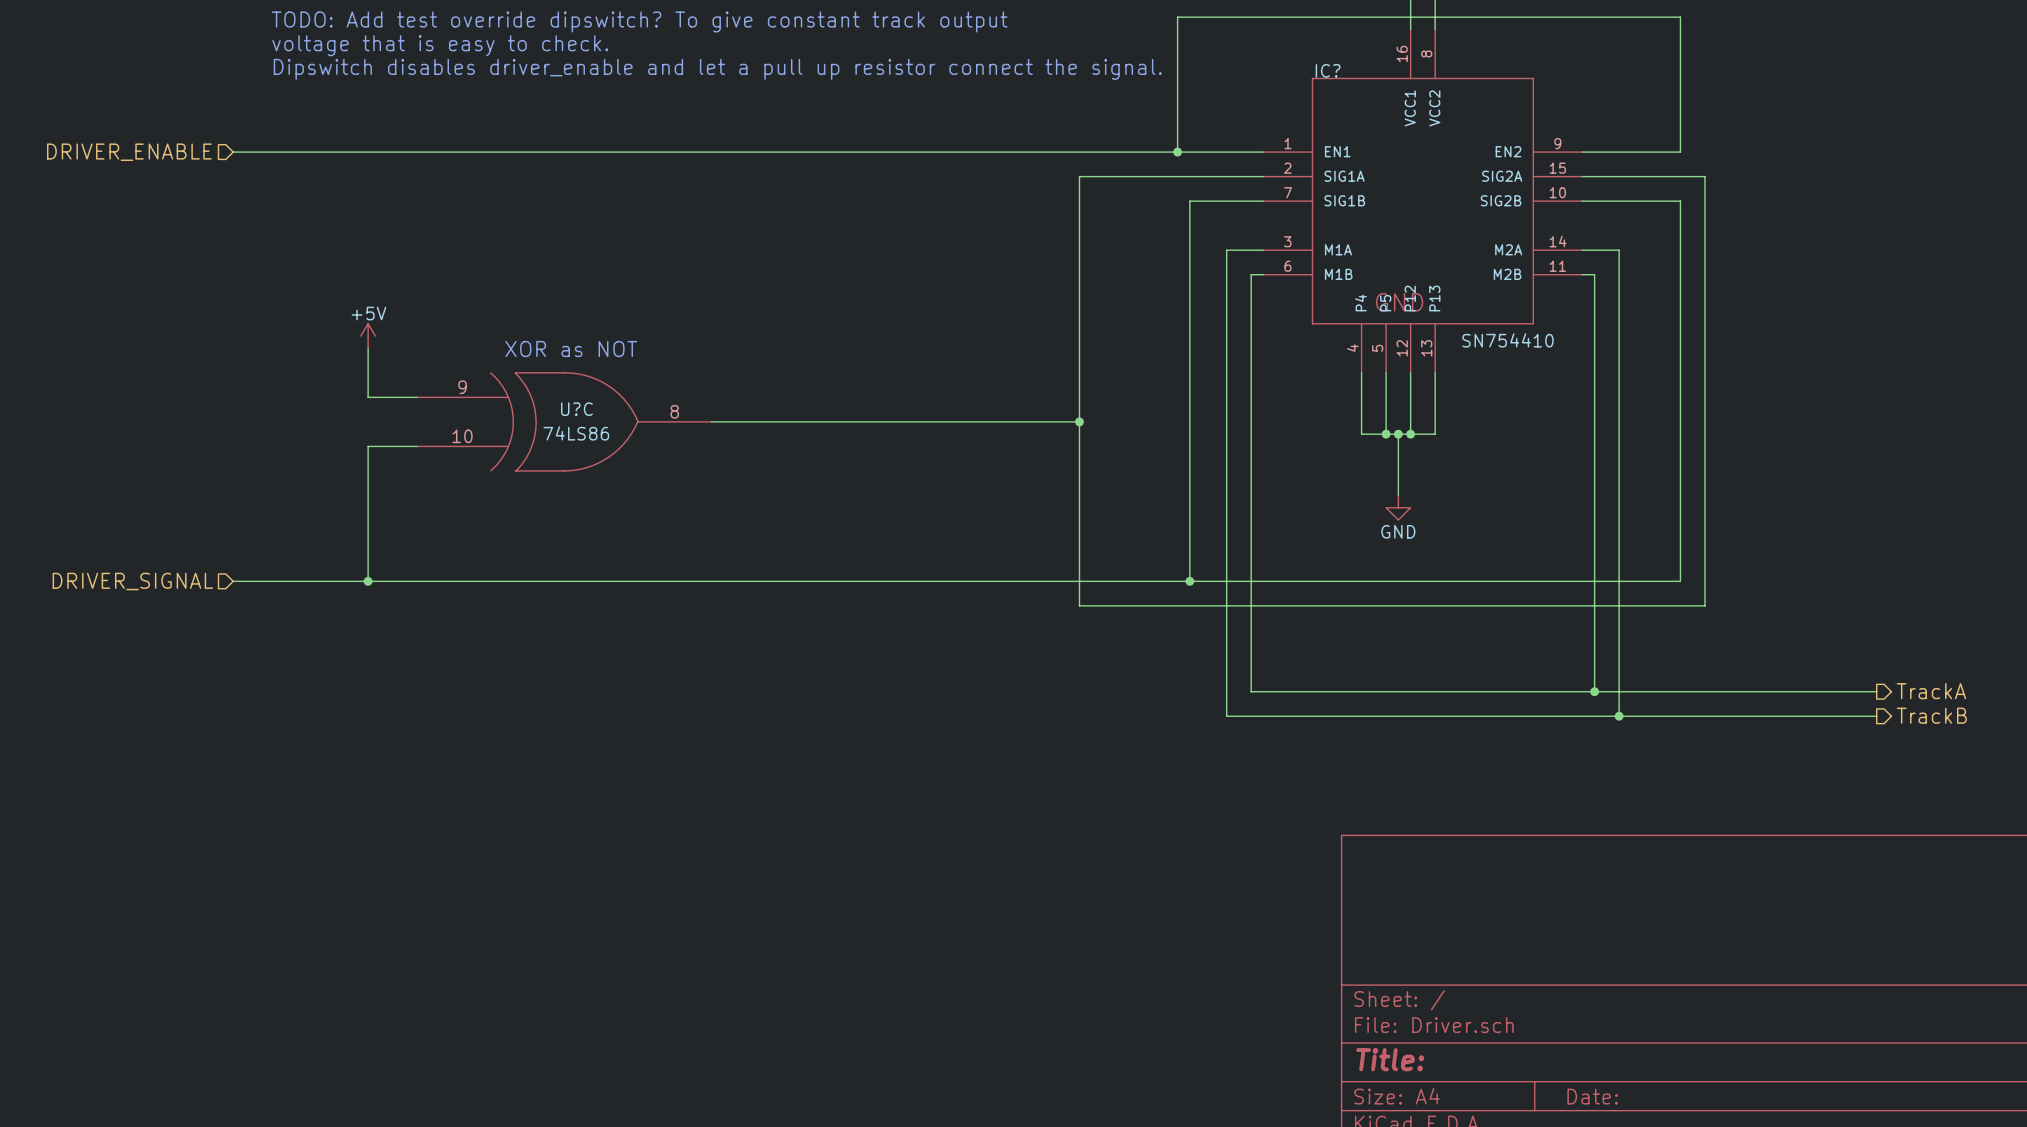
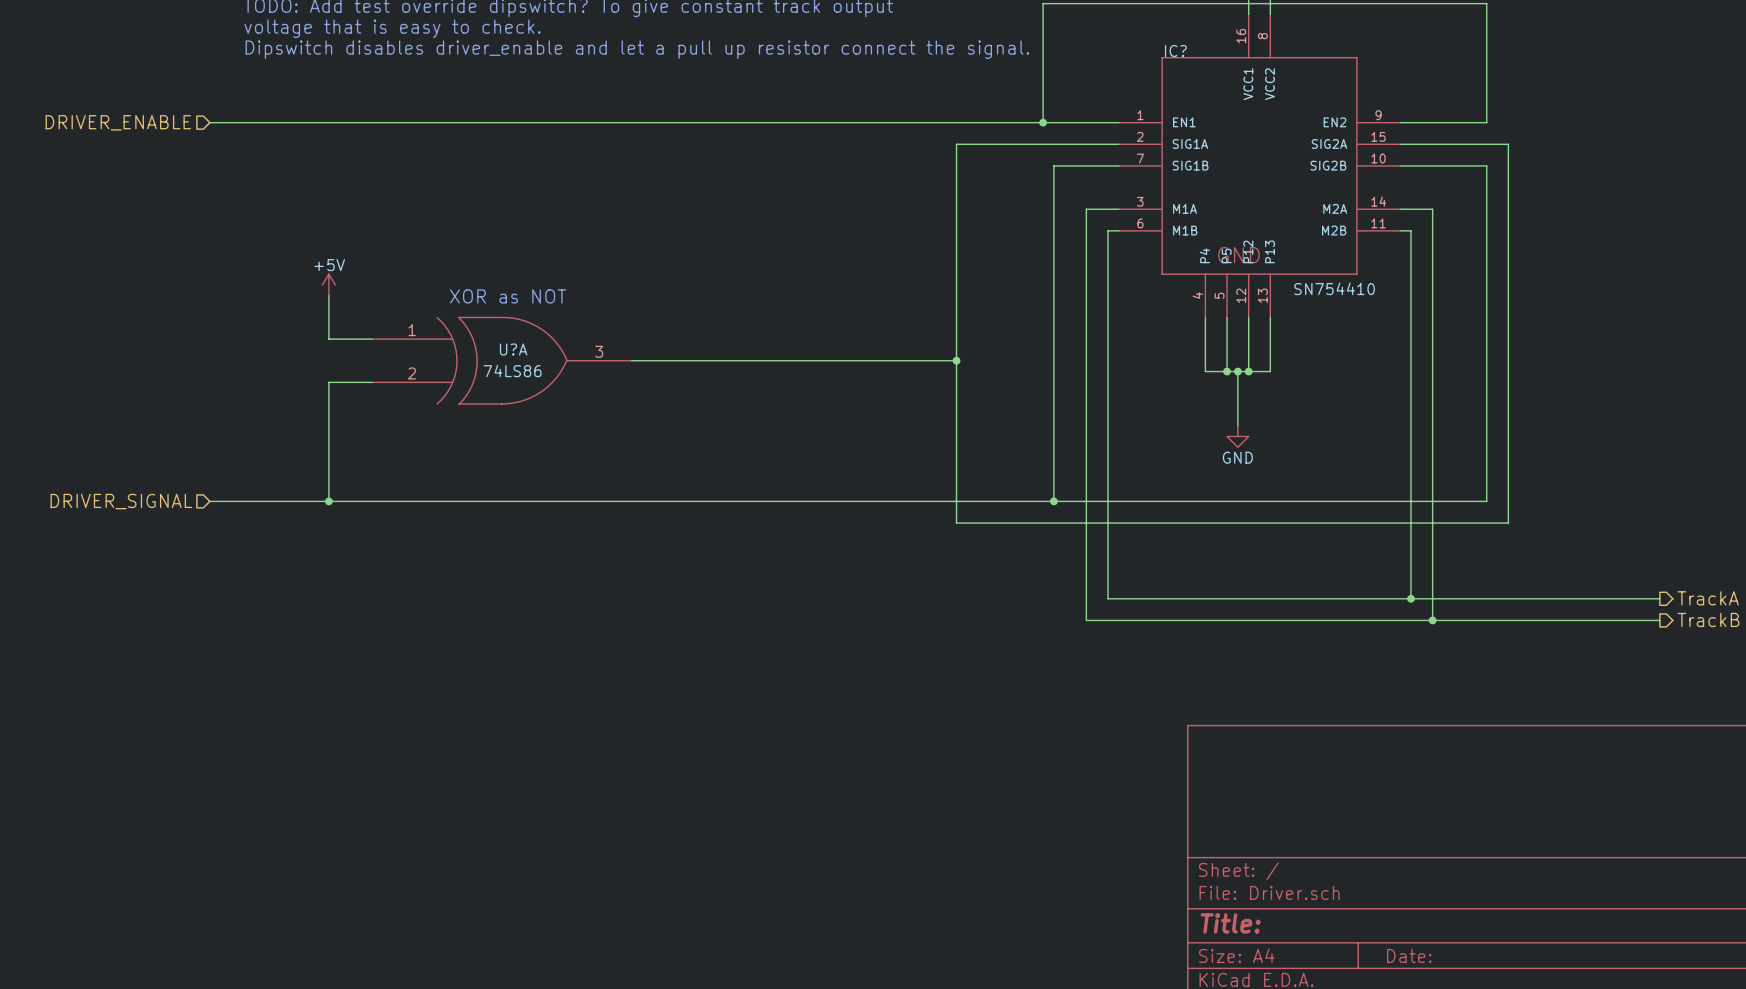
U?C pin number: 9 (462, 387) -> 1 (412, 330)
U?C name: U?C (576, 409) -> U?A (513, 349)
U?C pin number: 8 (674, 411) -> 3 (599, 351)
U?C pin number: 10 (462, 436) -> 2 (411, 373)

